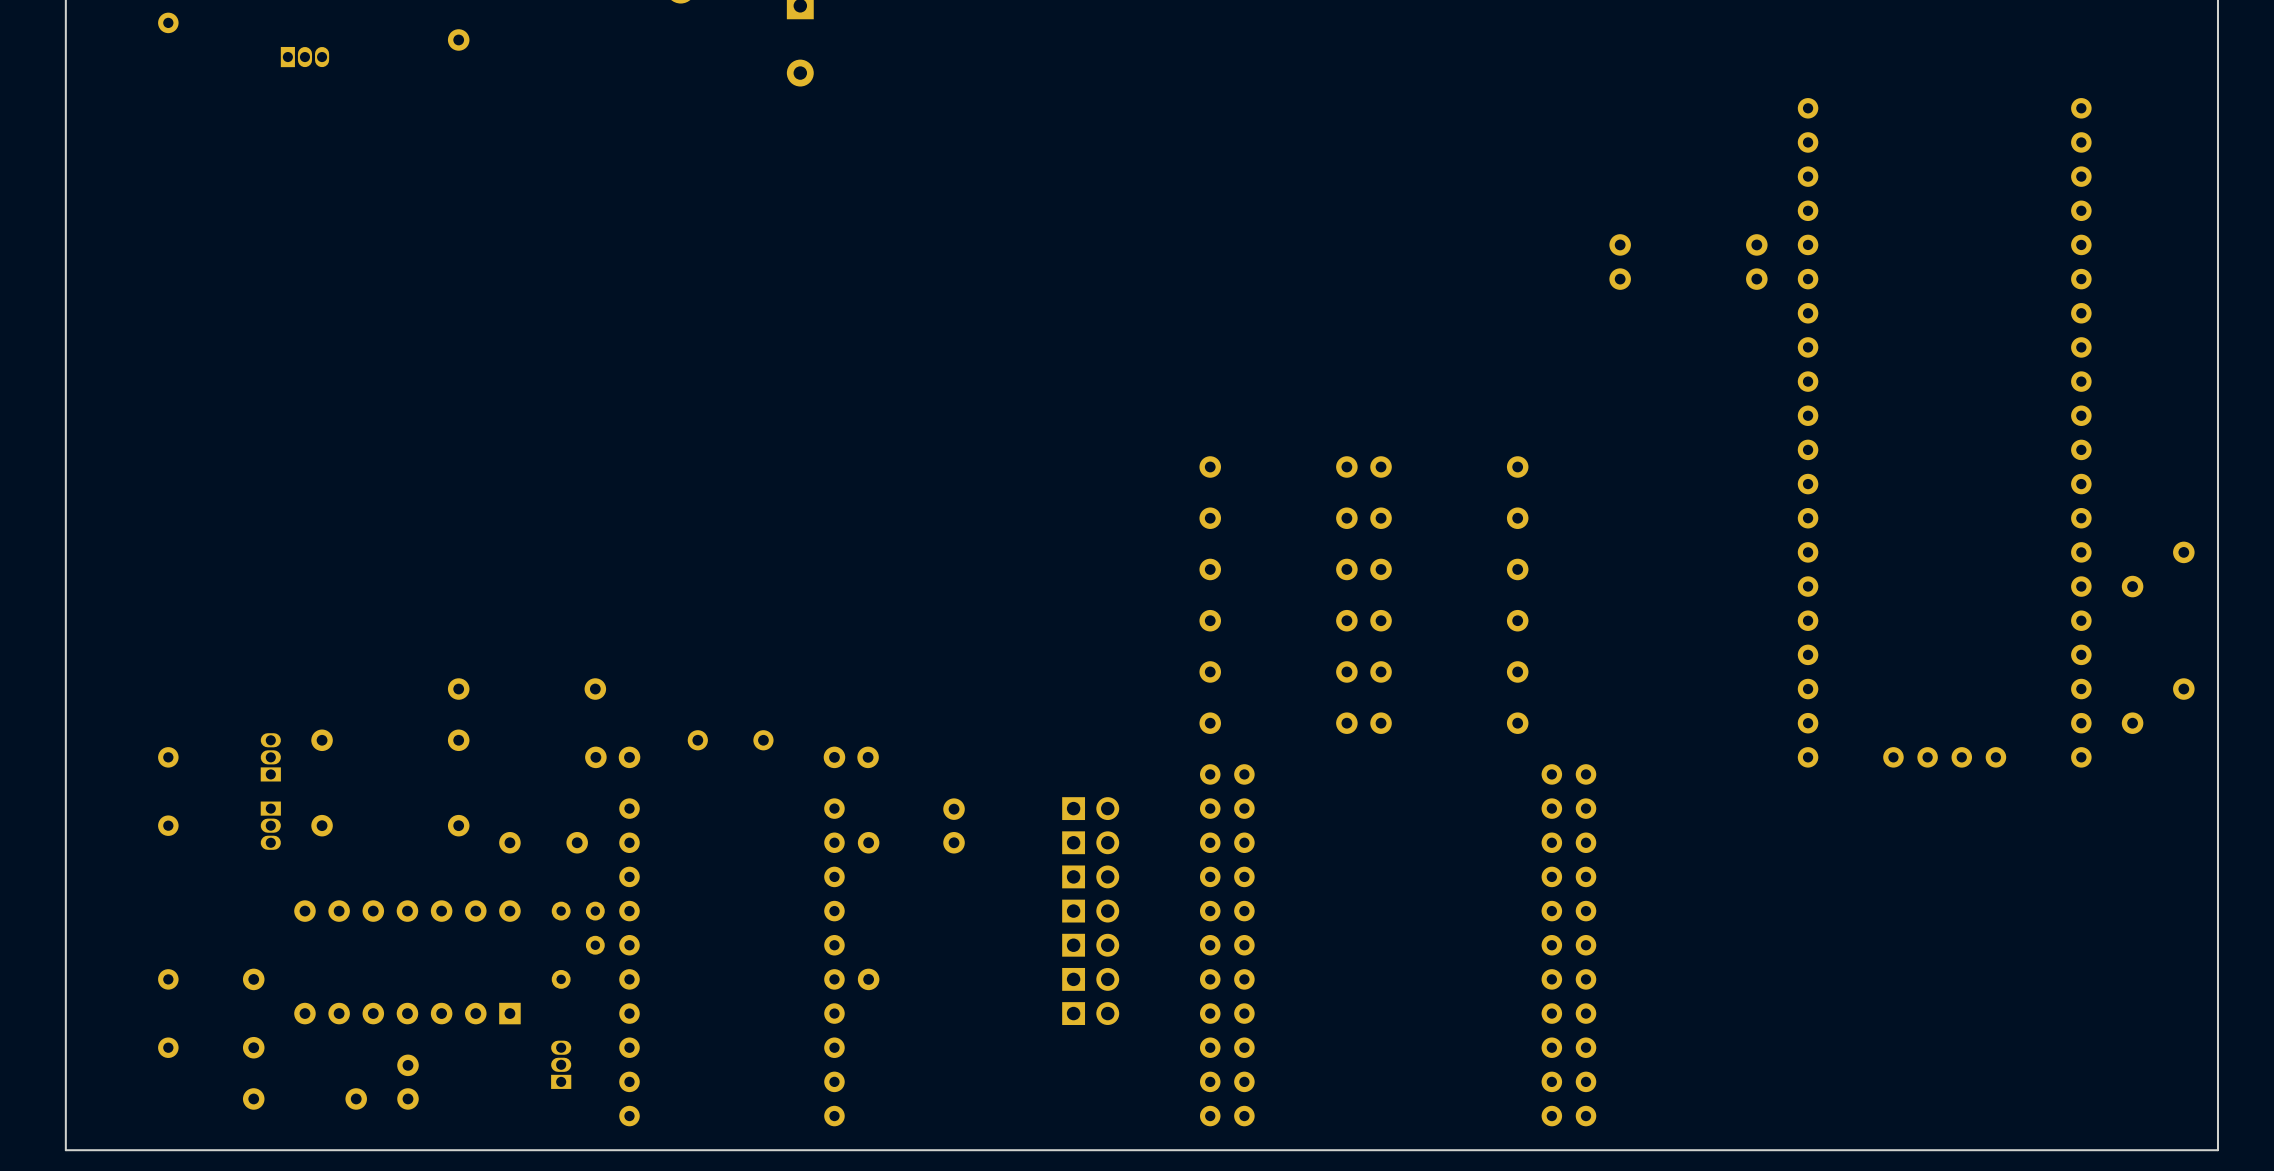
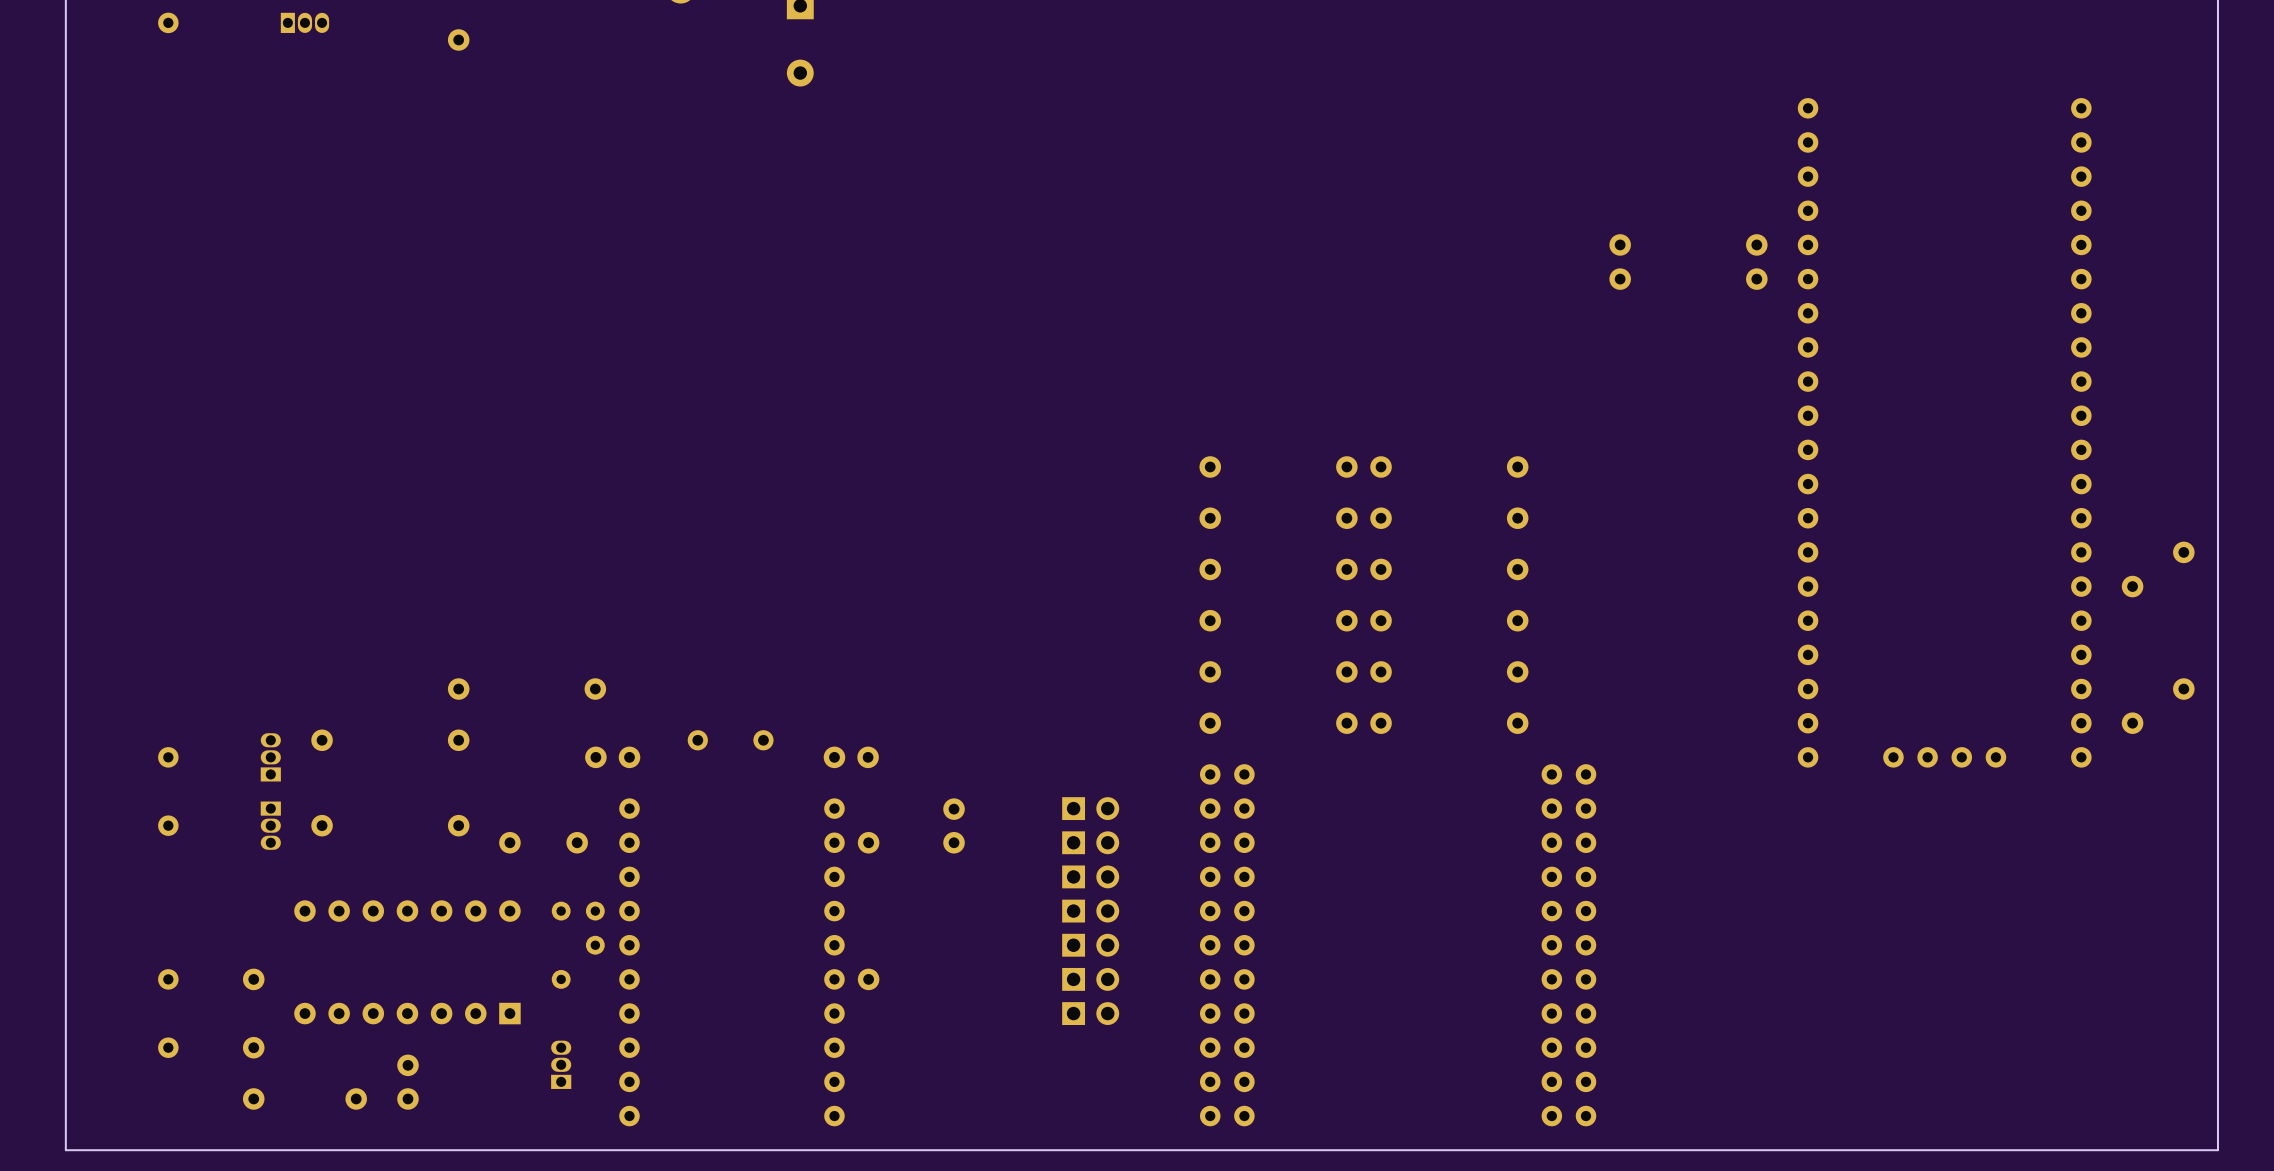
part position: (304, 57) -> (304, 22)

